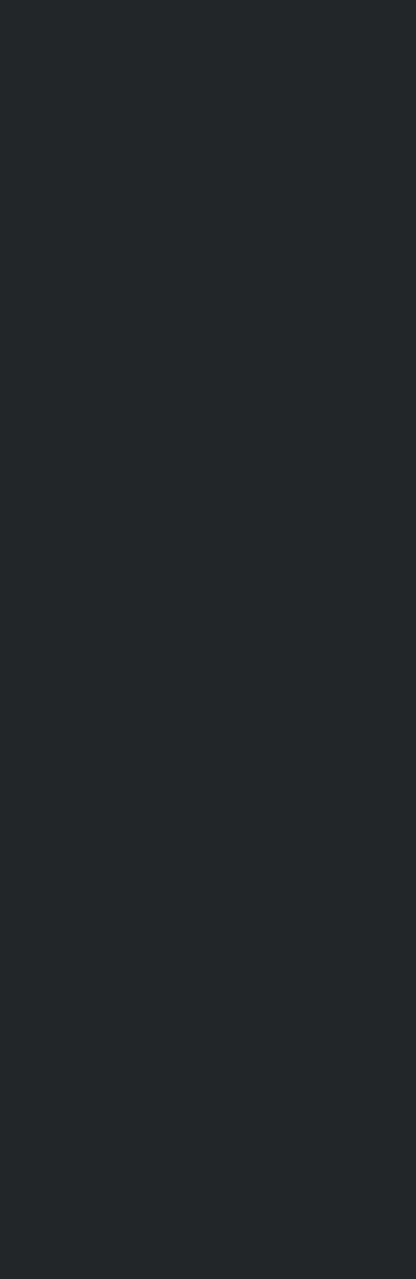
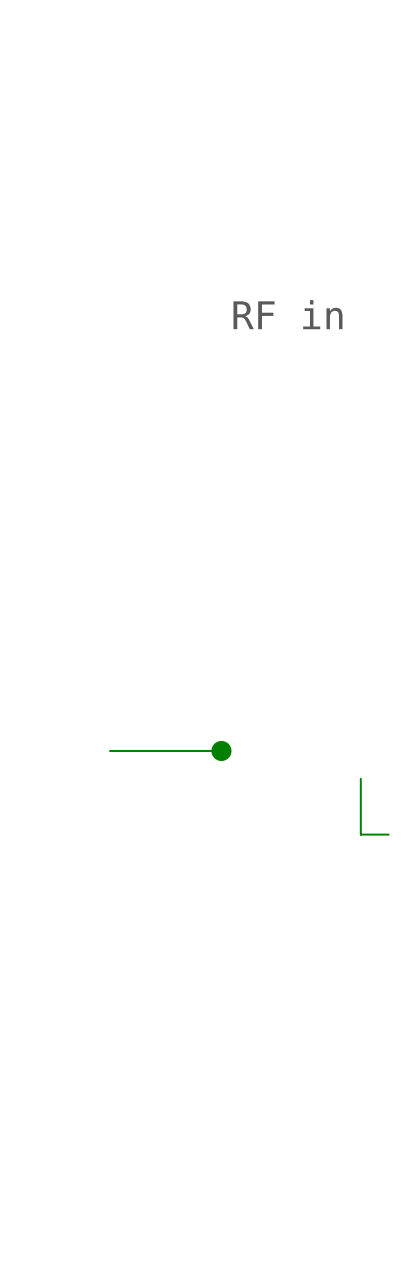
text: none -> RF in (287, 314)
wire: none -> (109, 750) (221, 750)
junction: none -> (221, 750)
wire: none -> (360, 778) (360, 834) (388, 834)

